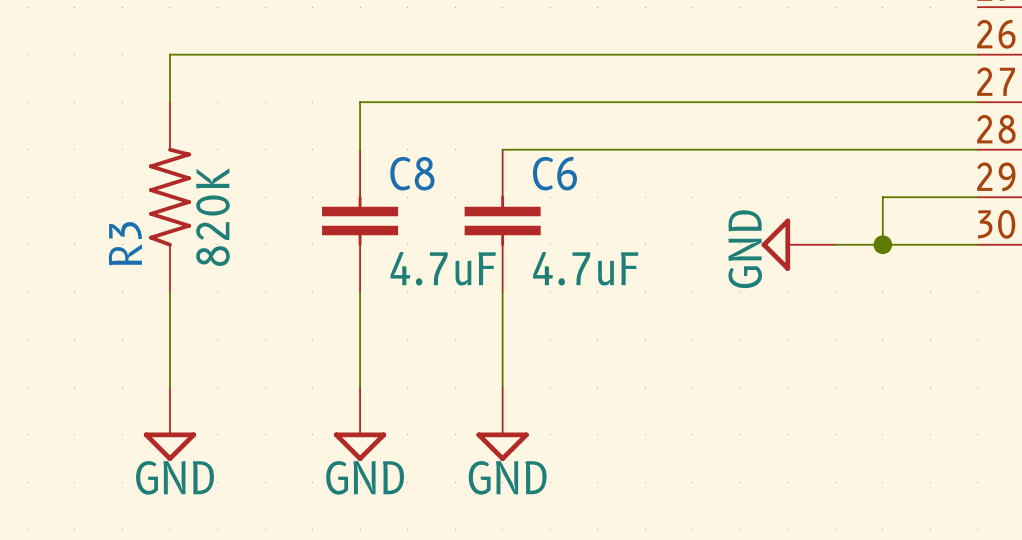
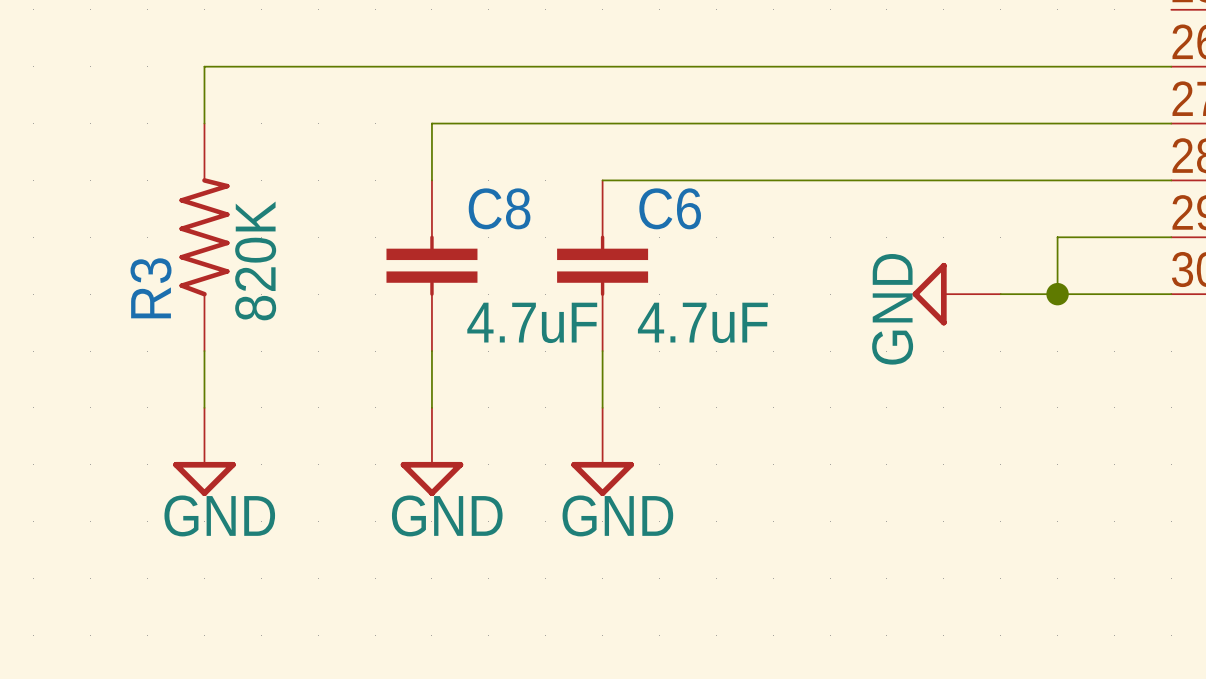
power symbol position: GND (169, 424) -> GND (204, 451)
power symbol position: GND (360, 424) -> GND (431, 451)
power symbol position: GND (502, 424) -> GND (602, 451)

